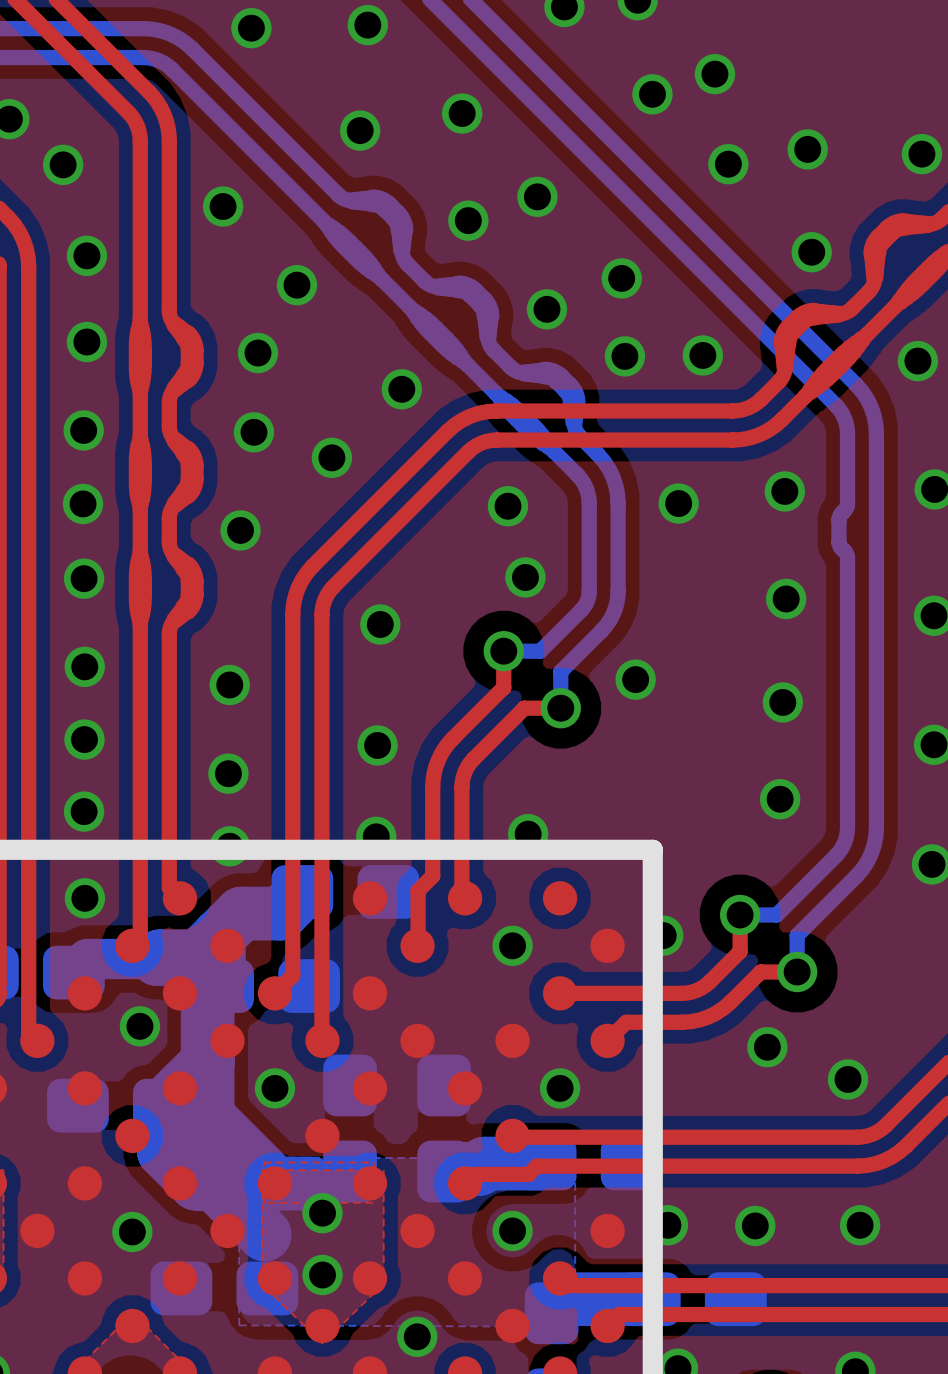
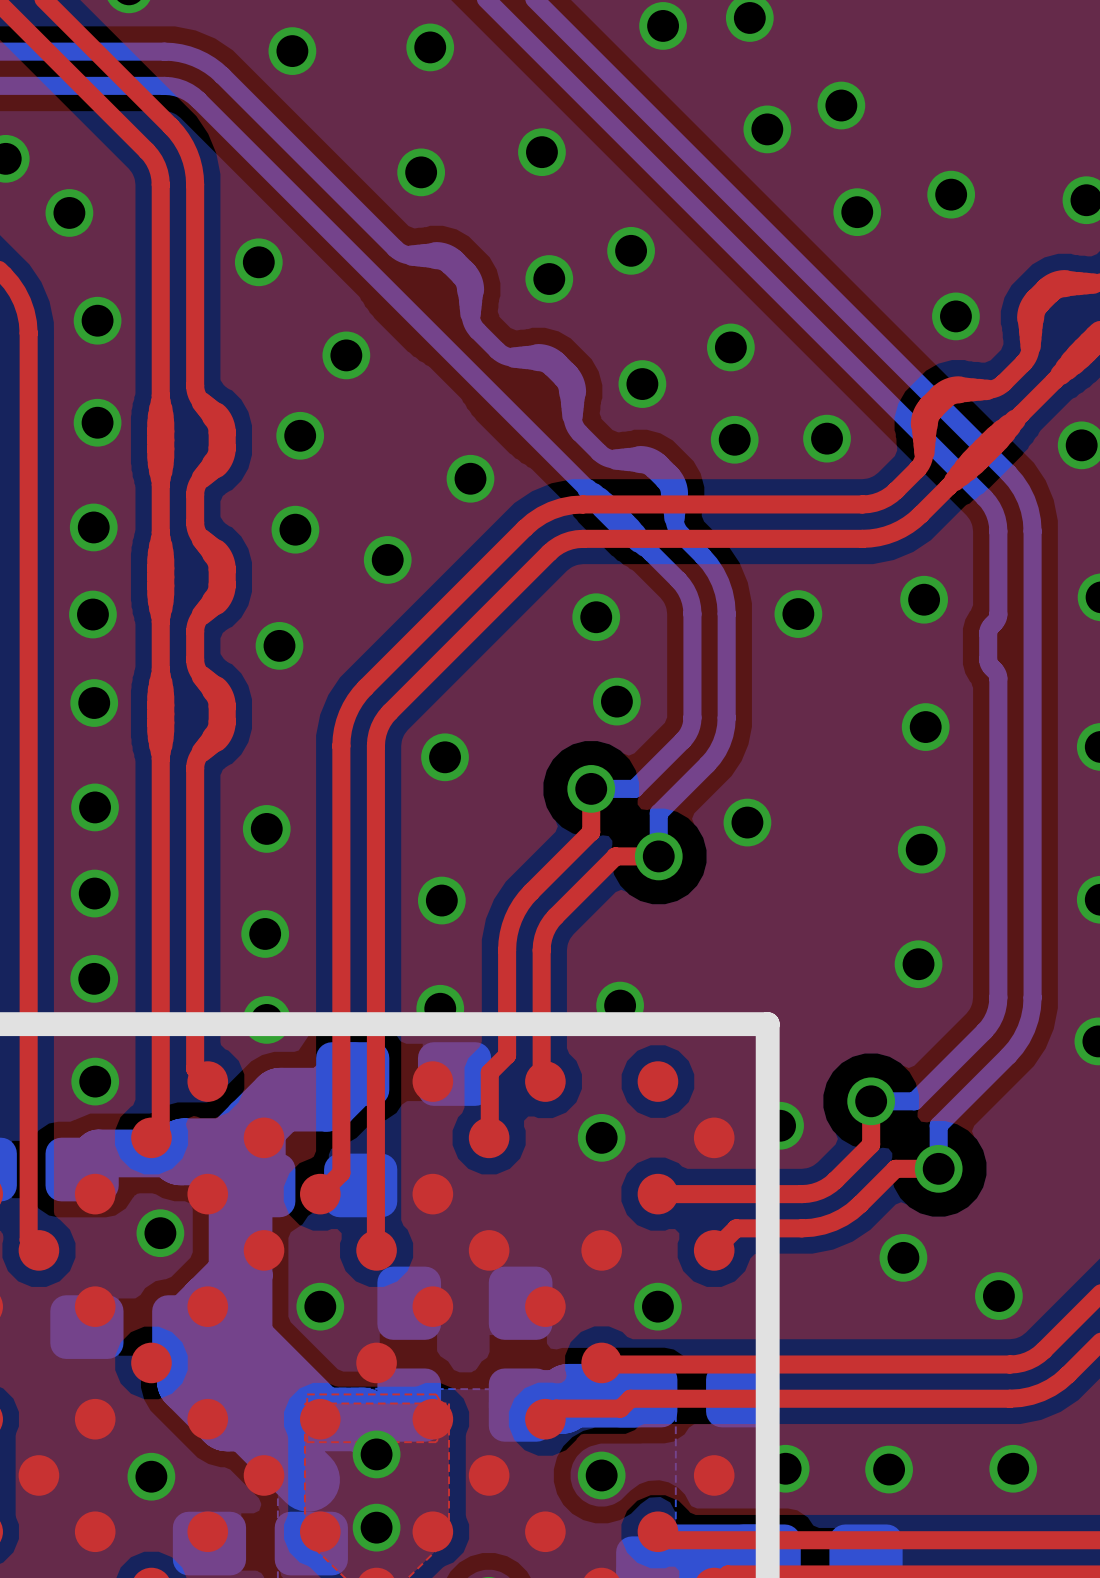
bottom track width: thick (328, 225) (376, 274) -> thin (383, 285) (440, 342)
bottom track width: thick (414, 311) (462, 360) -> thin (485, 387) (542, 444)

